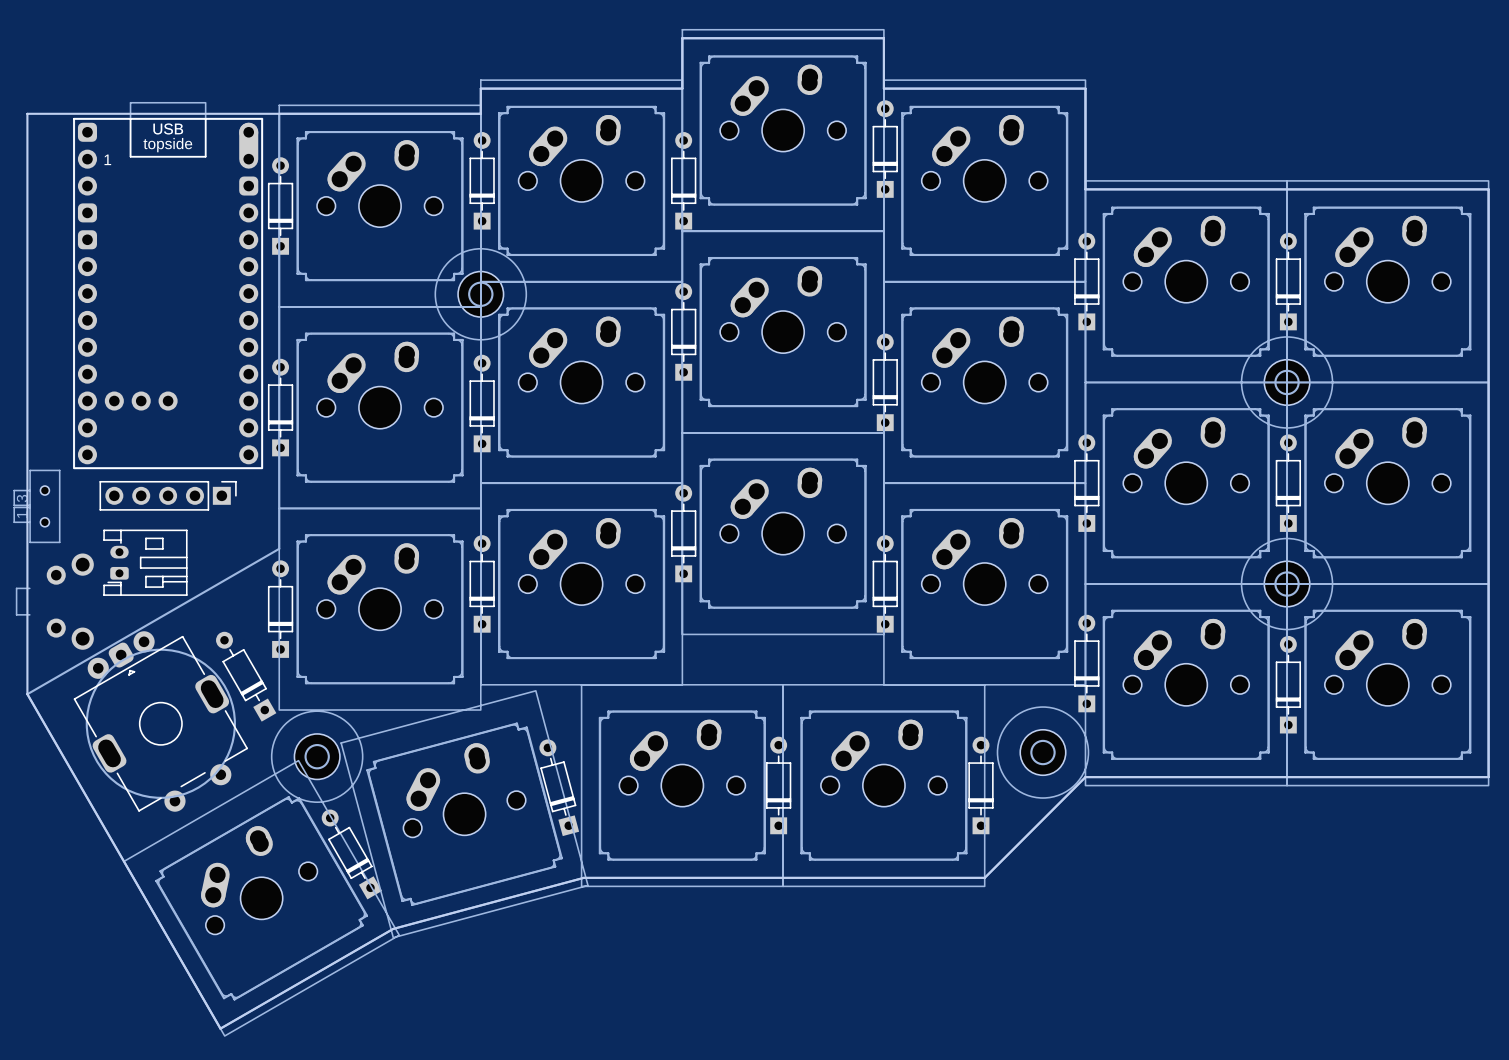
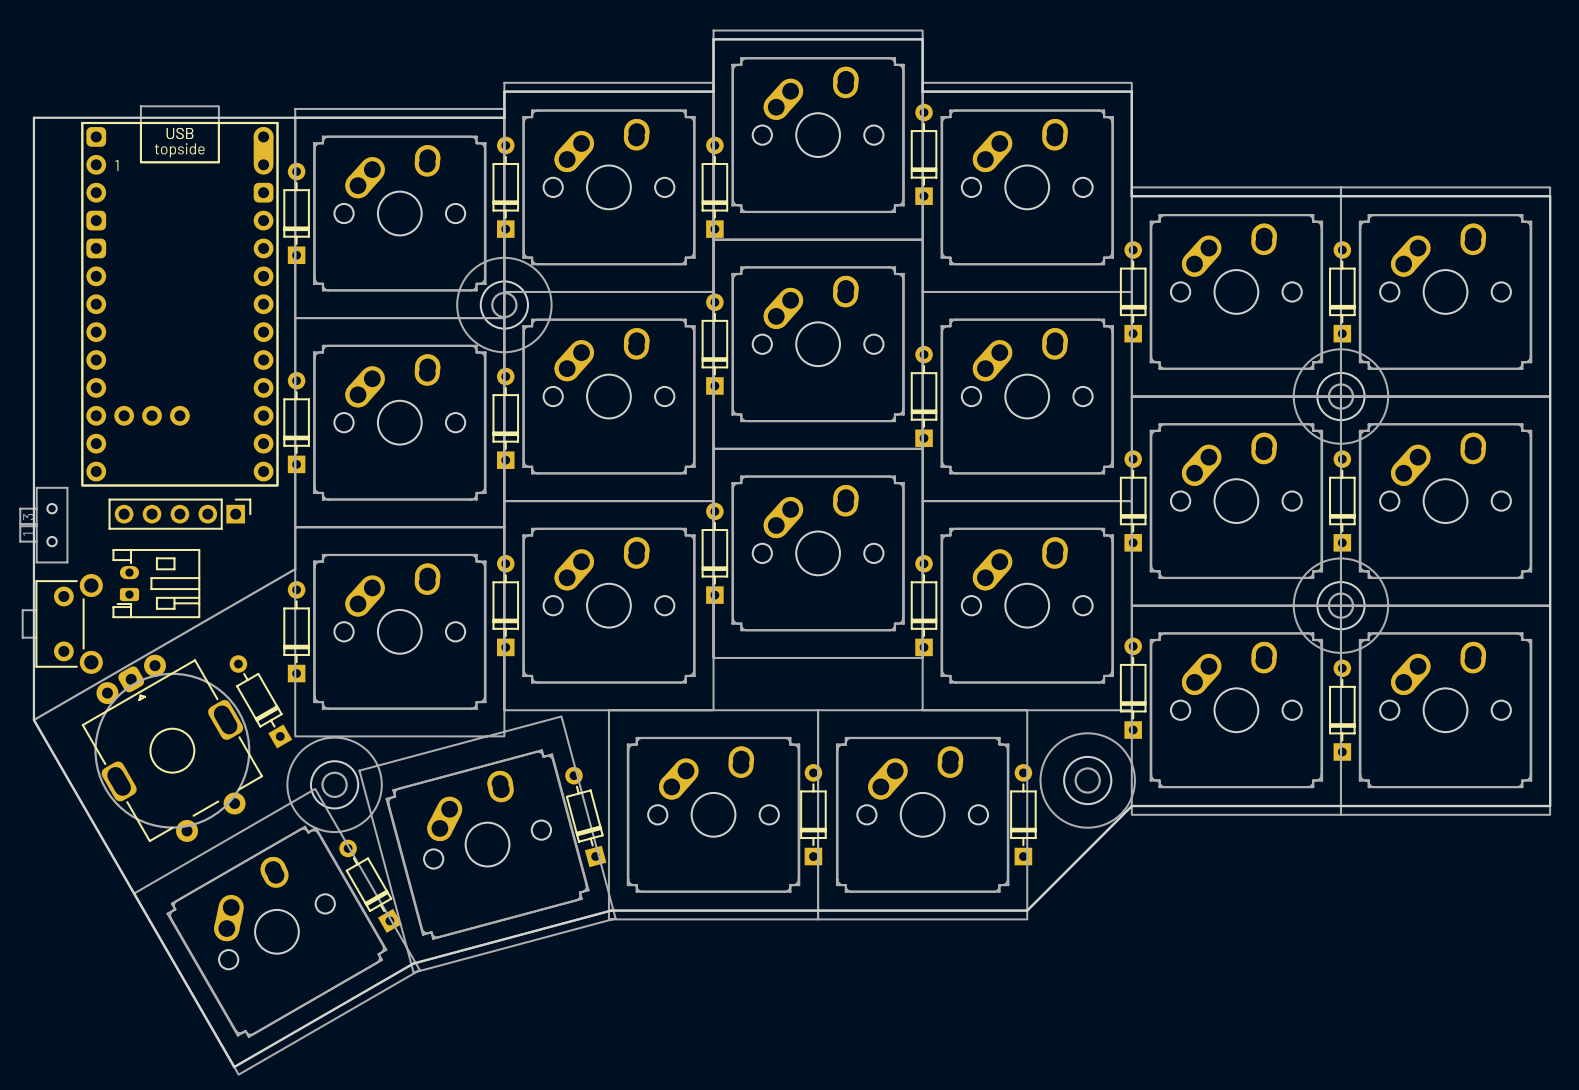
part side: bottom (54, 601) -> top (62, 623)

